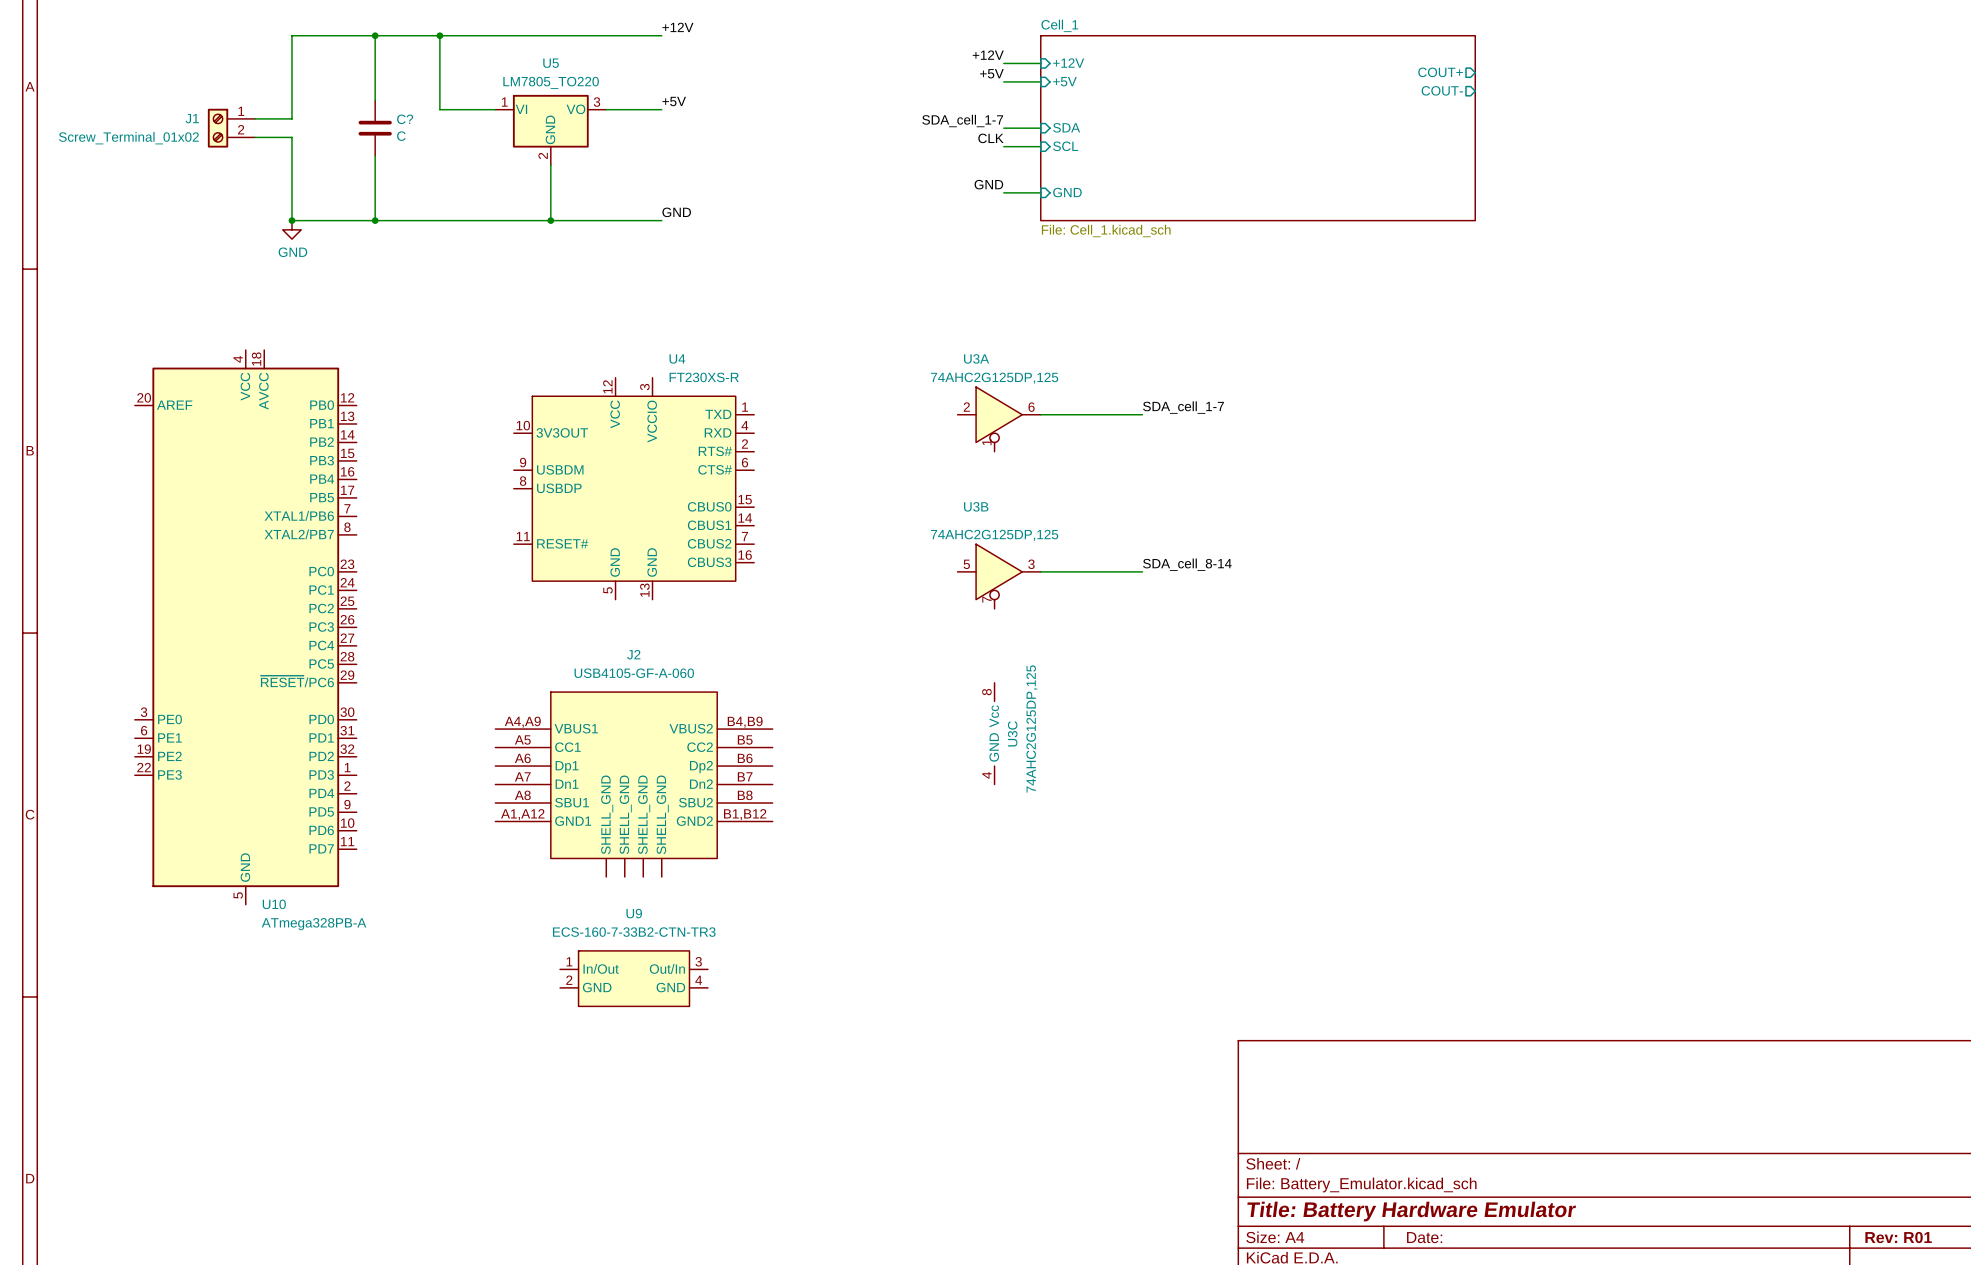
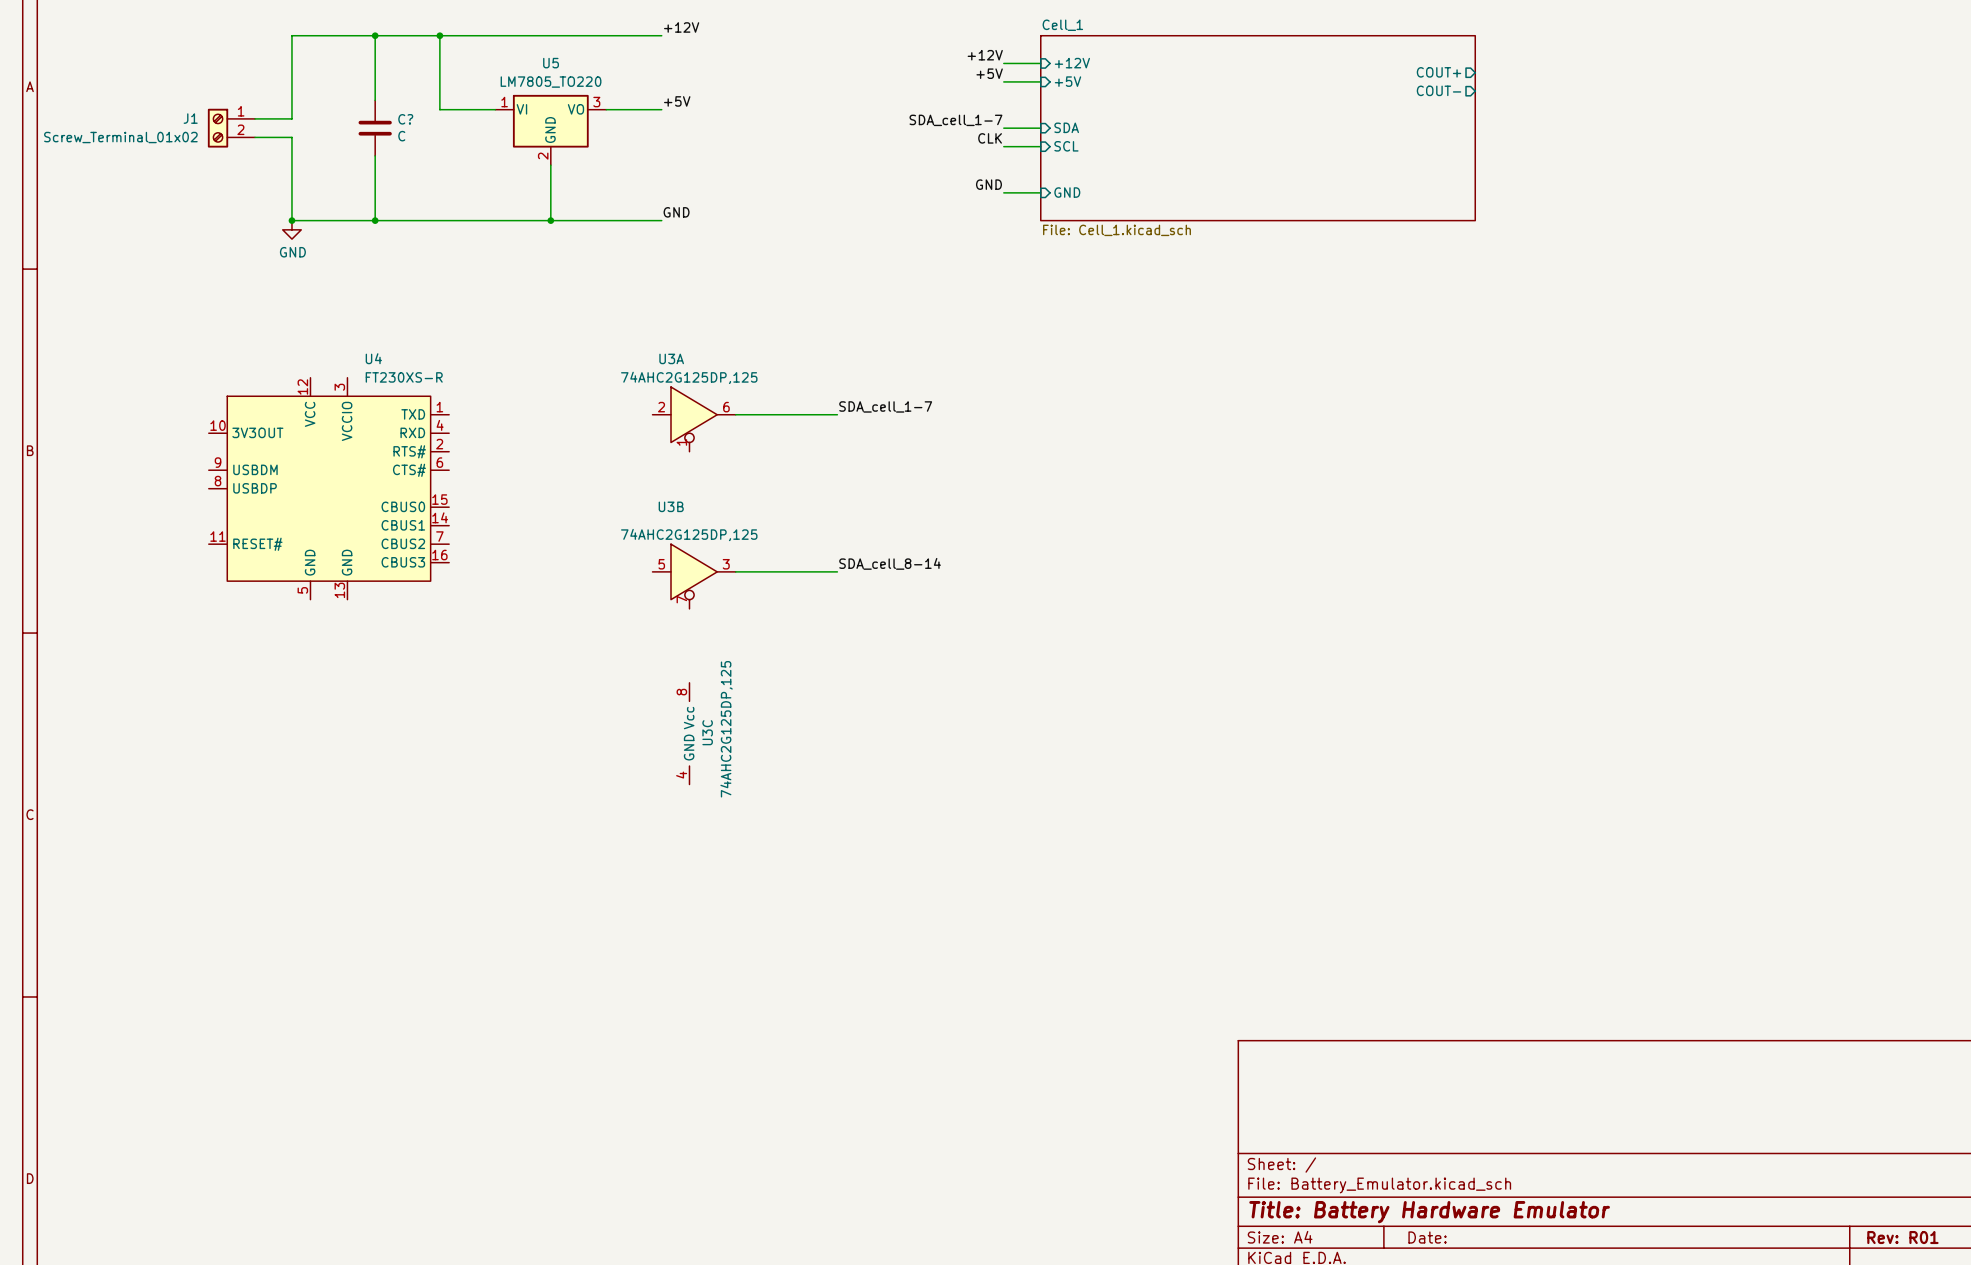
label: none -> SDA_cell_1-7 (885, 406)
label: SDA_cell_1-7 (1183, 407) -> none
wire: none -> (735, 414) (837, 414)
wire: (1040, 414) (1142, 414) -> none
U3A position: (999, 419) -> (694, 419)
U4 position: (634, 488) -> (328, 488)
label: none -> SDA_cell_8-14 (890, 563)
label: SDA_cell_8-14 (1187, 564) -> none
wire: none -> (735, 571) (837, 571)
wire: (1040, 571) (1142, 571) -> none
U3B position: (999, 576) -> (694, 576)
U10: ATmega328PB-A (245, 627) -> none
U3C position: (994, 733) -> (689, 733)
J2: USB4105-GF-A-060 (634, 784) -> none
U9: ECS-160-7-33B2-CTN-TR3 (634, 978) -> none

